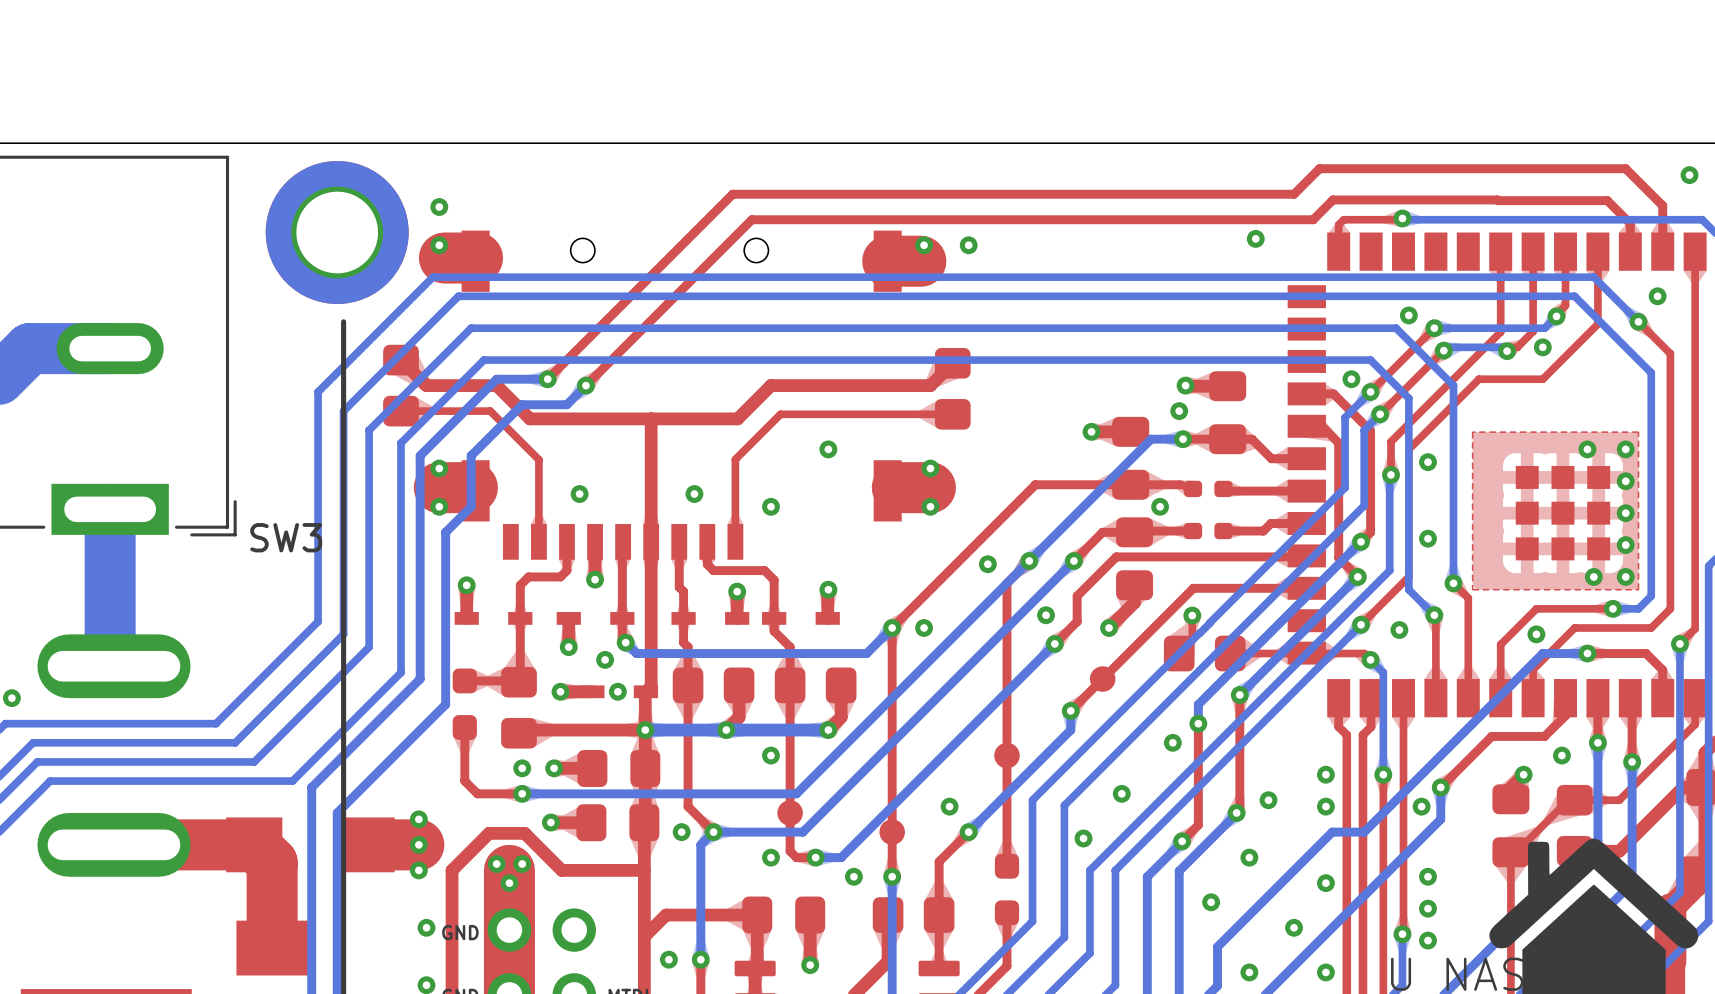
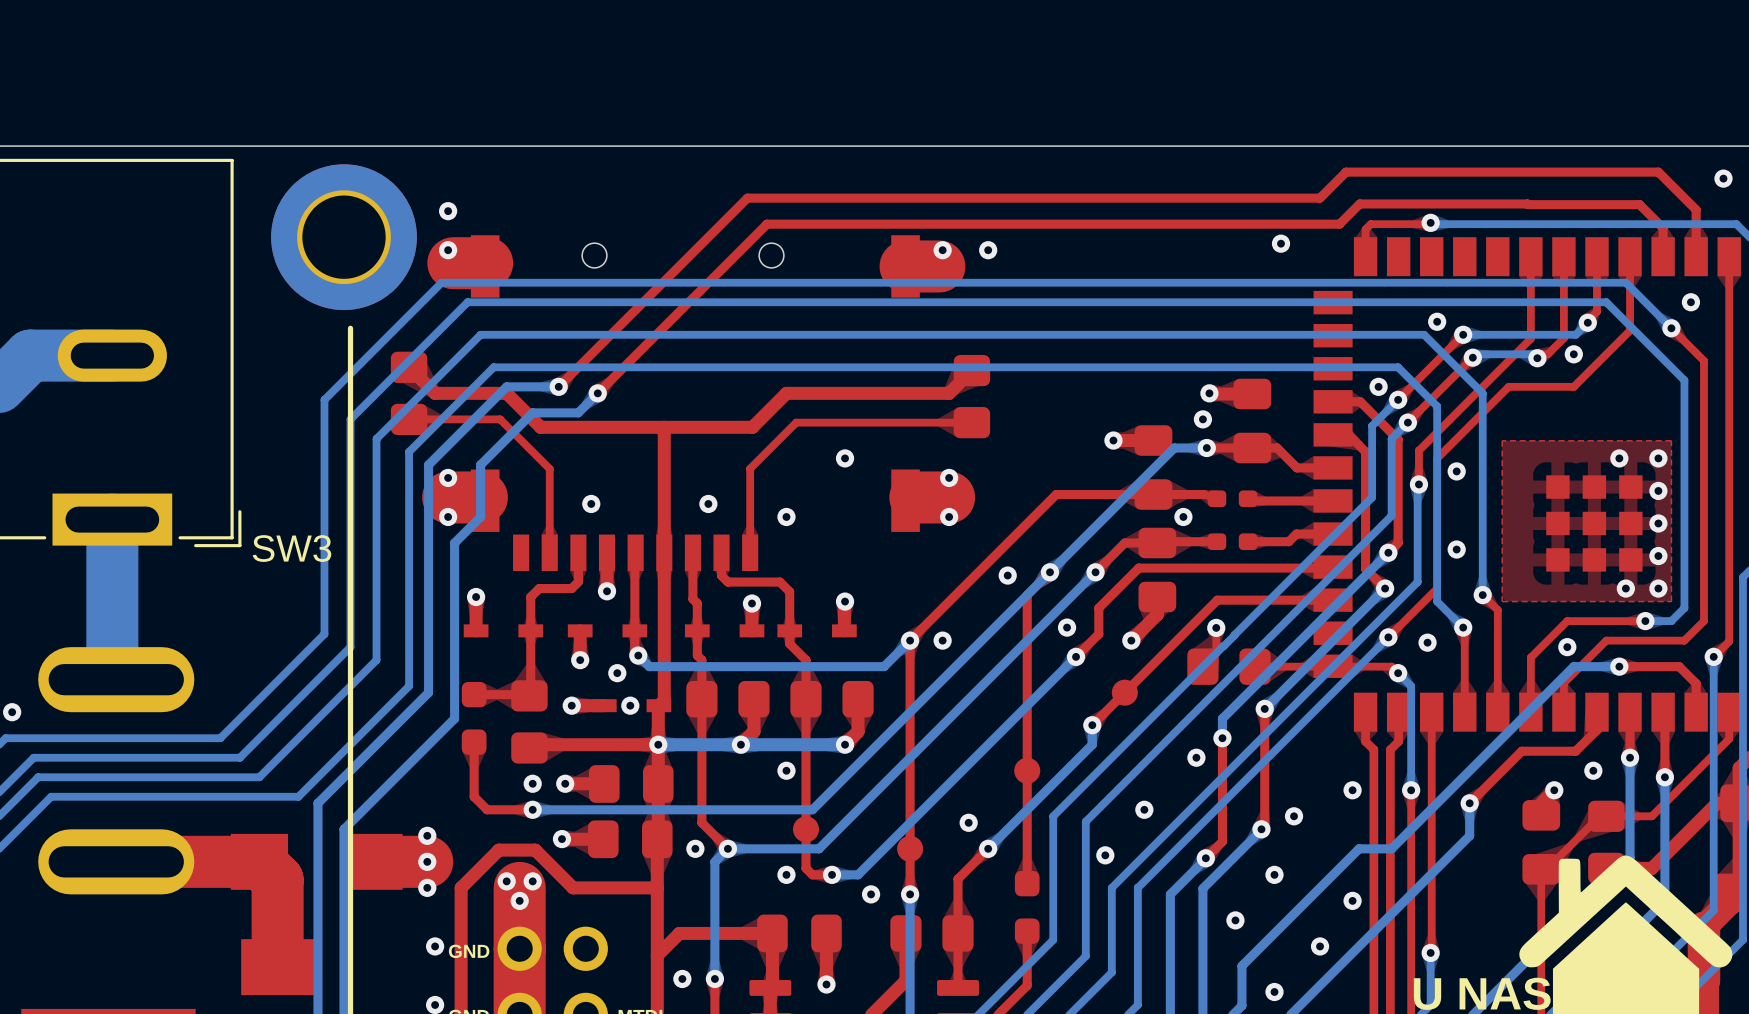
via: (1325, 806) -> none
via: (1421, 806) -> none
via: (1427, 876) -> none
via: (1427, 908) -> none
via: (1427, 940) -> none
via: (1325, 972) -> none

